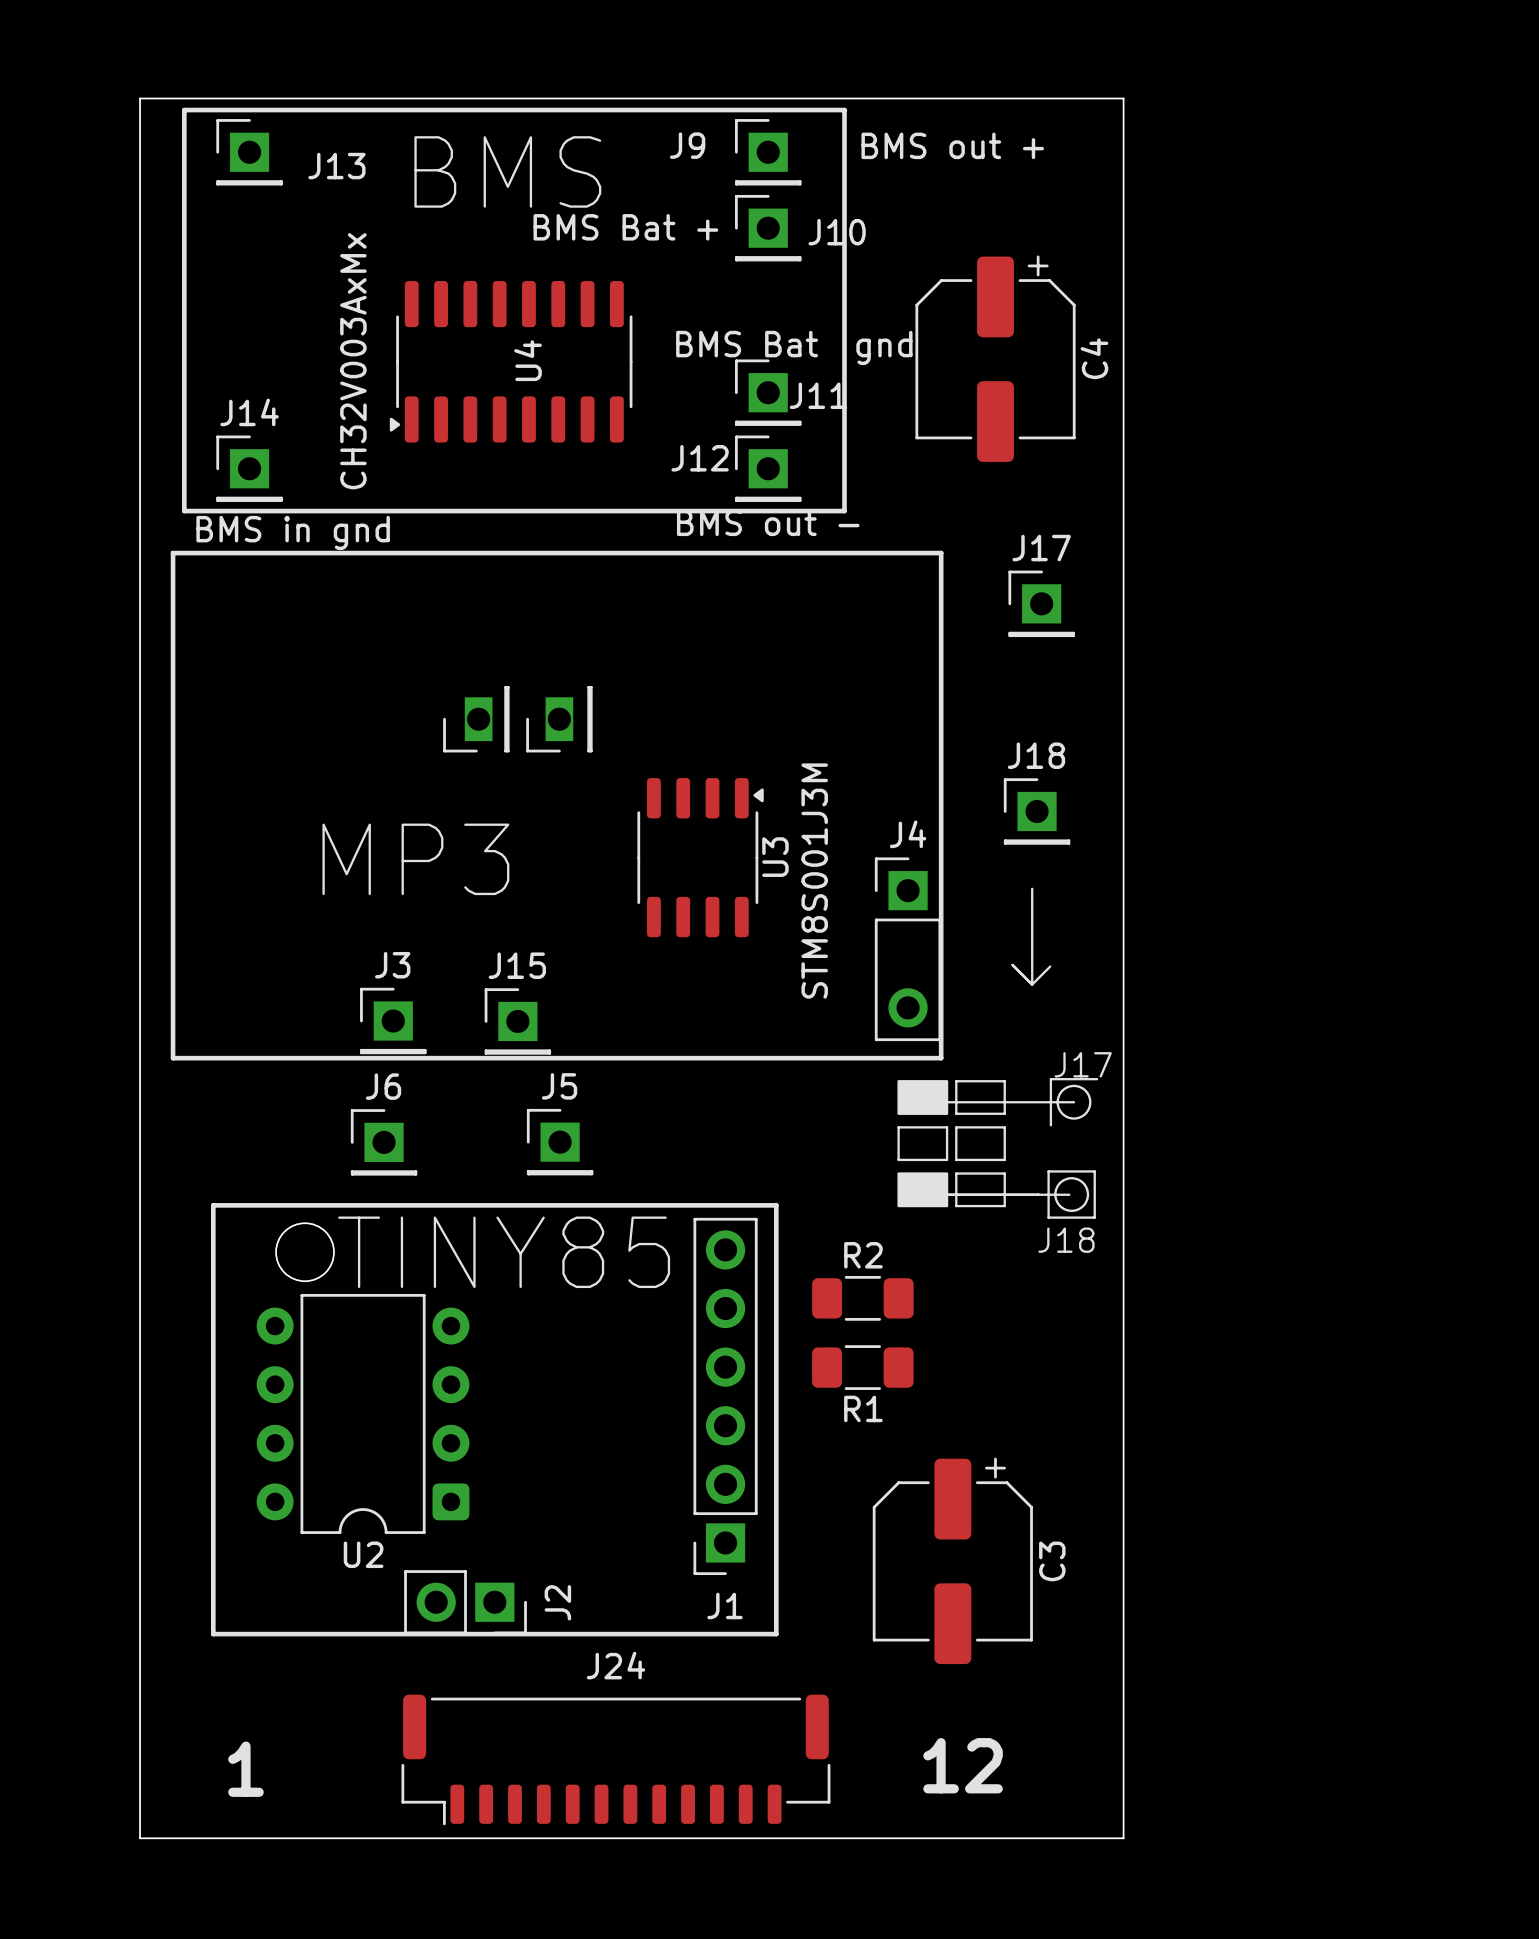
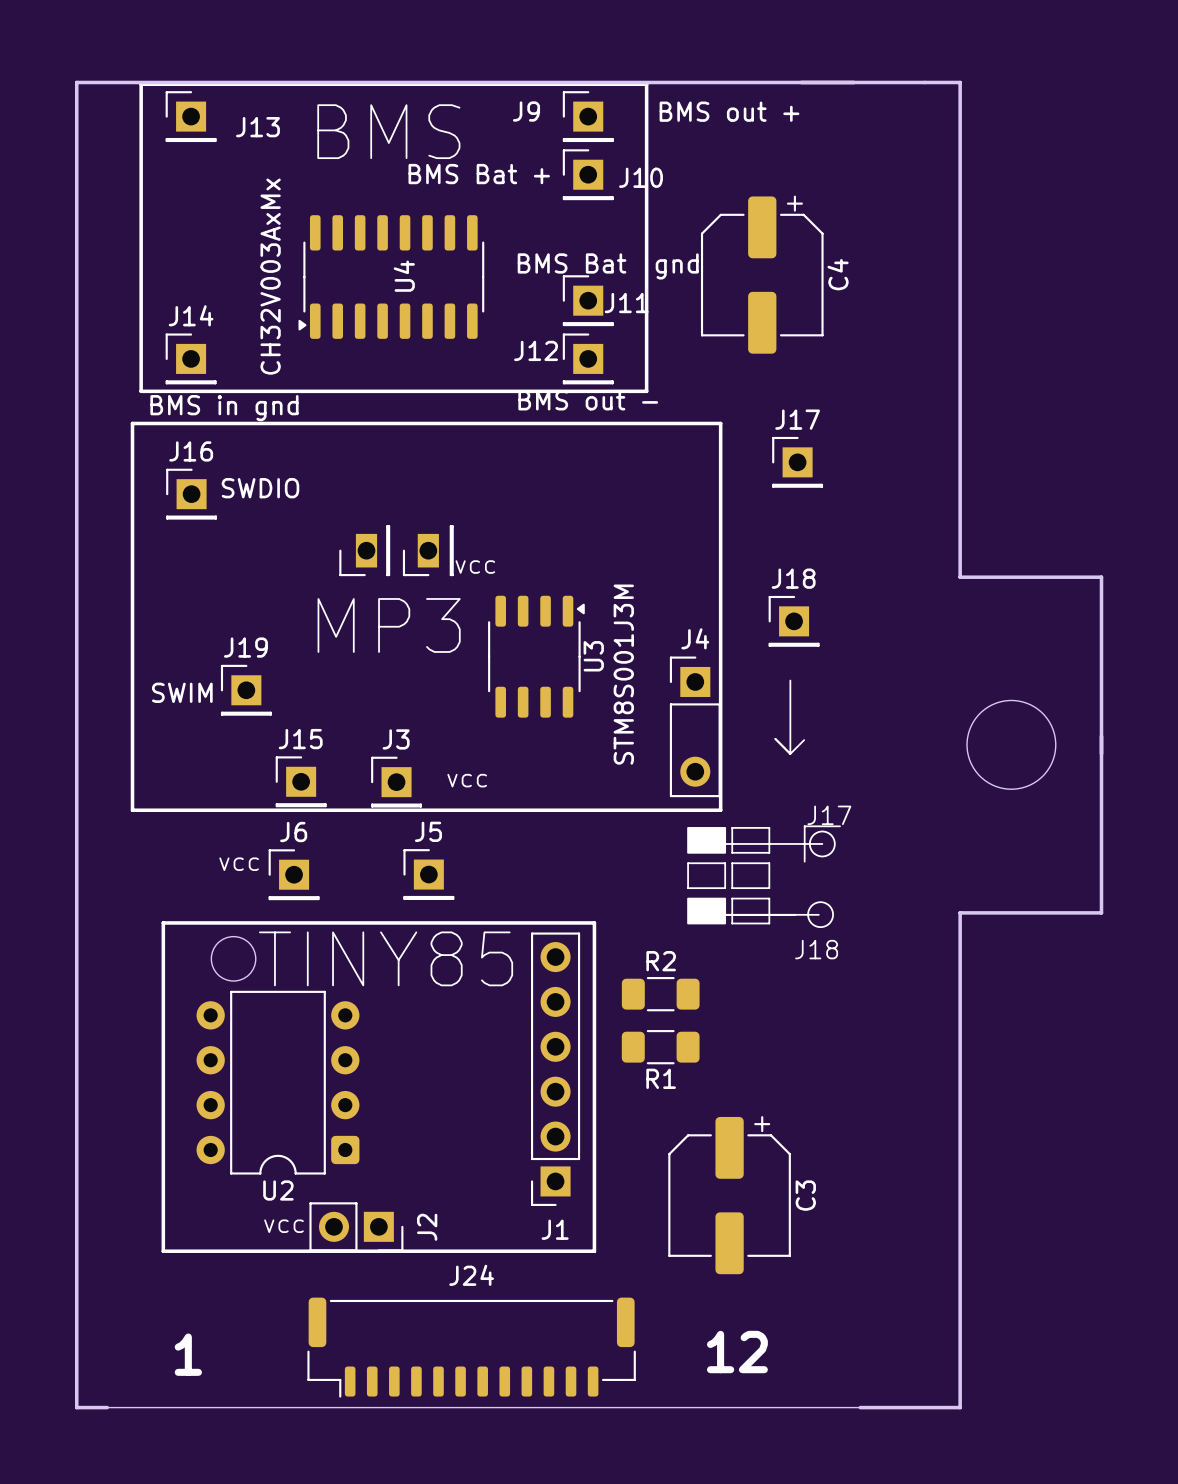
J16: none -> SWDIO (191, 494)
text: none -> vcc (475, 567)
text position: MP3 (415, 859) -> MP3 (389, 625)
J19: none -> SWIM (246, 690)
round board edge: none -> [966, 700, 1056, 790]
J3 name: J3 (392, 965) -> J15 (300, 739)
J15 name: J15 (517, 965) -> J3 (396, 739)
text: none -> vcc (467, 780)
text: none -> vcc (239, 864)
line: (1048, 1171) (1094, 1171) (1094, 1217) (1048, 1217) (1048, 1171) -> none
text: none -> vcc (284, 1226)
board edge: (140, 1838) (140, 98) (1123, 98) (1123, 1838) -> (107, 1407) (76, 1407) (76, 82) (960, 82) (960, 577) (1101, 577) (1101, 912) (960, 912) (960, 1407) (860, 1407)

